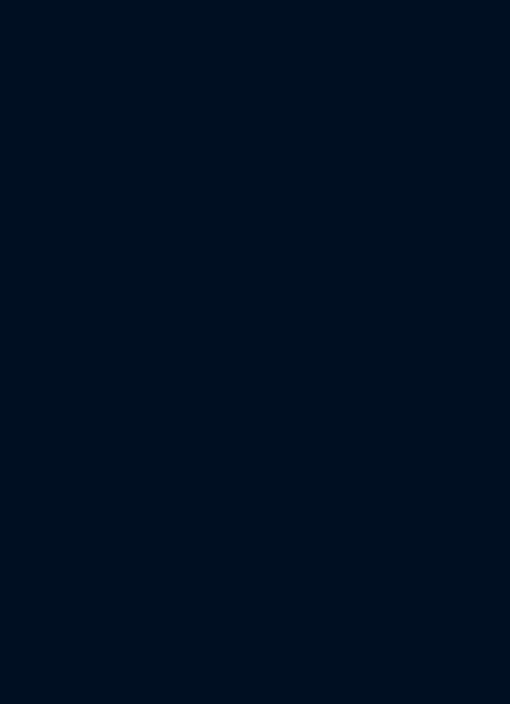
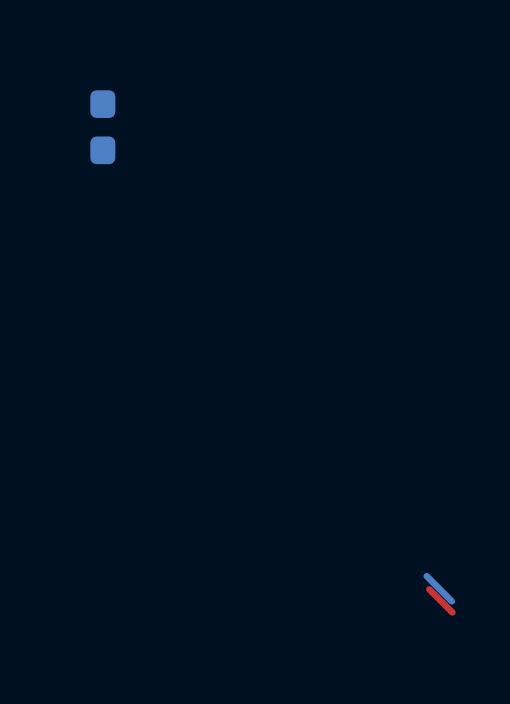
part: none -> (102, 127)
bottom track: none -> (426, 576) (451, 601)
top track: none -> (429, 589) (452, 612)

